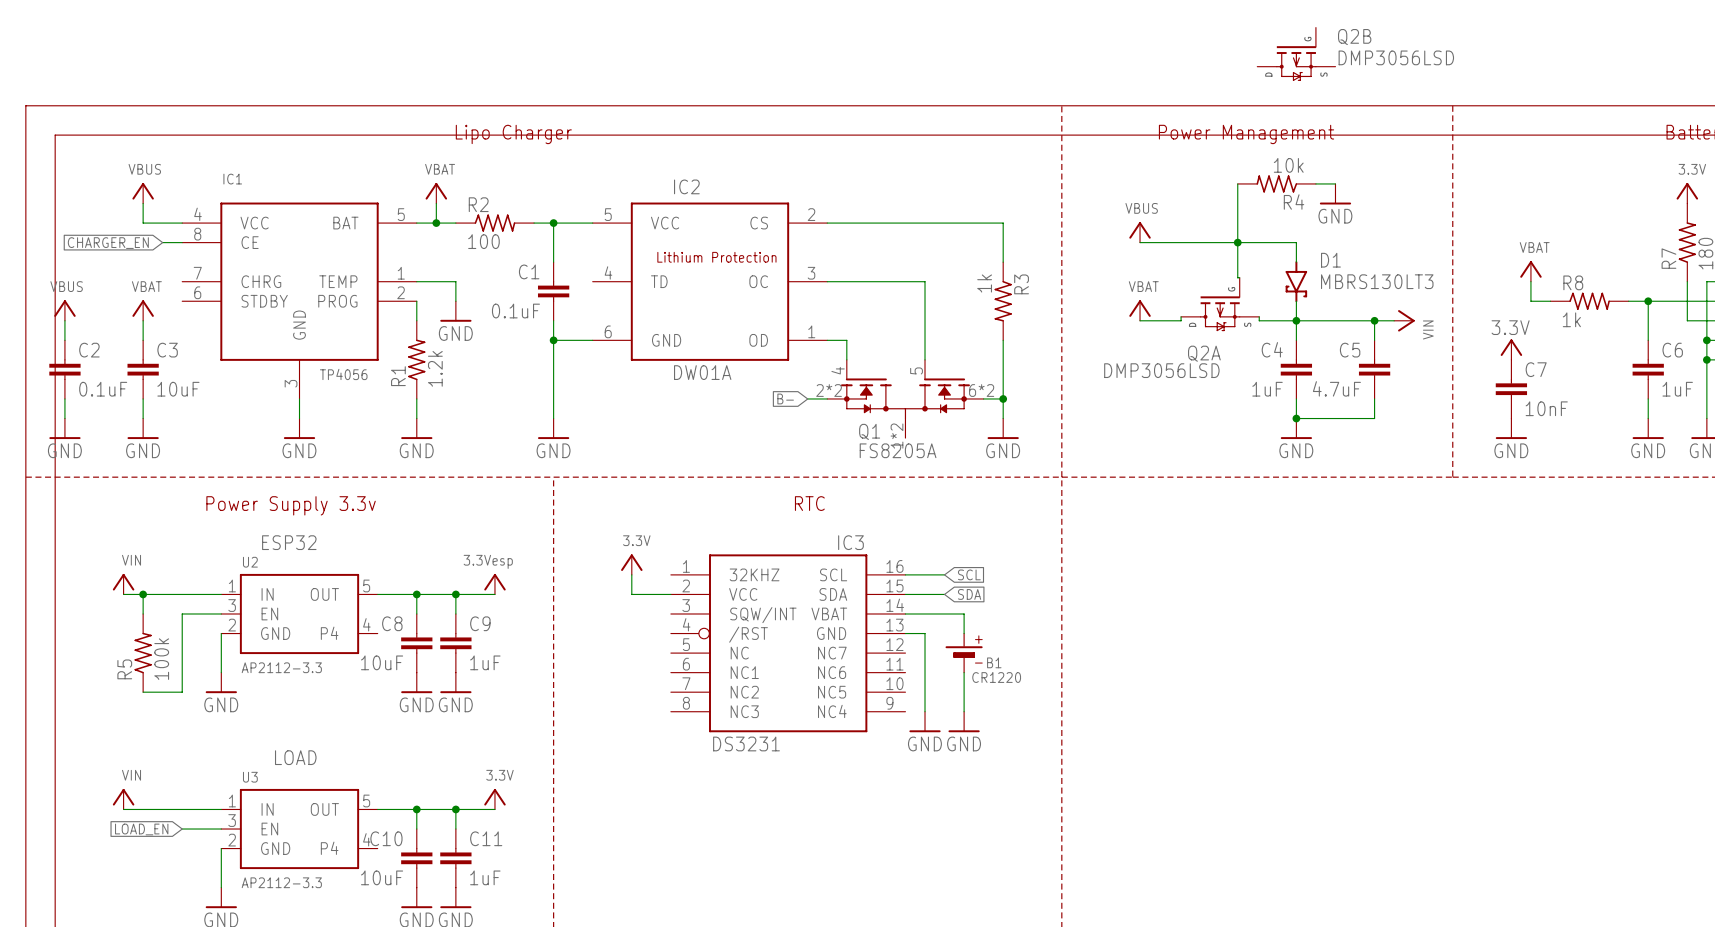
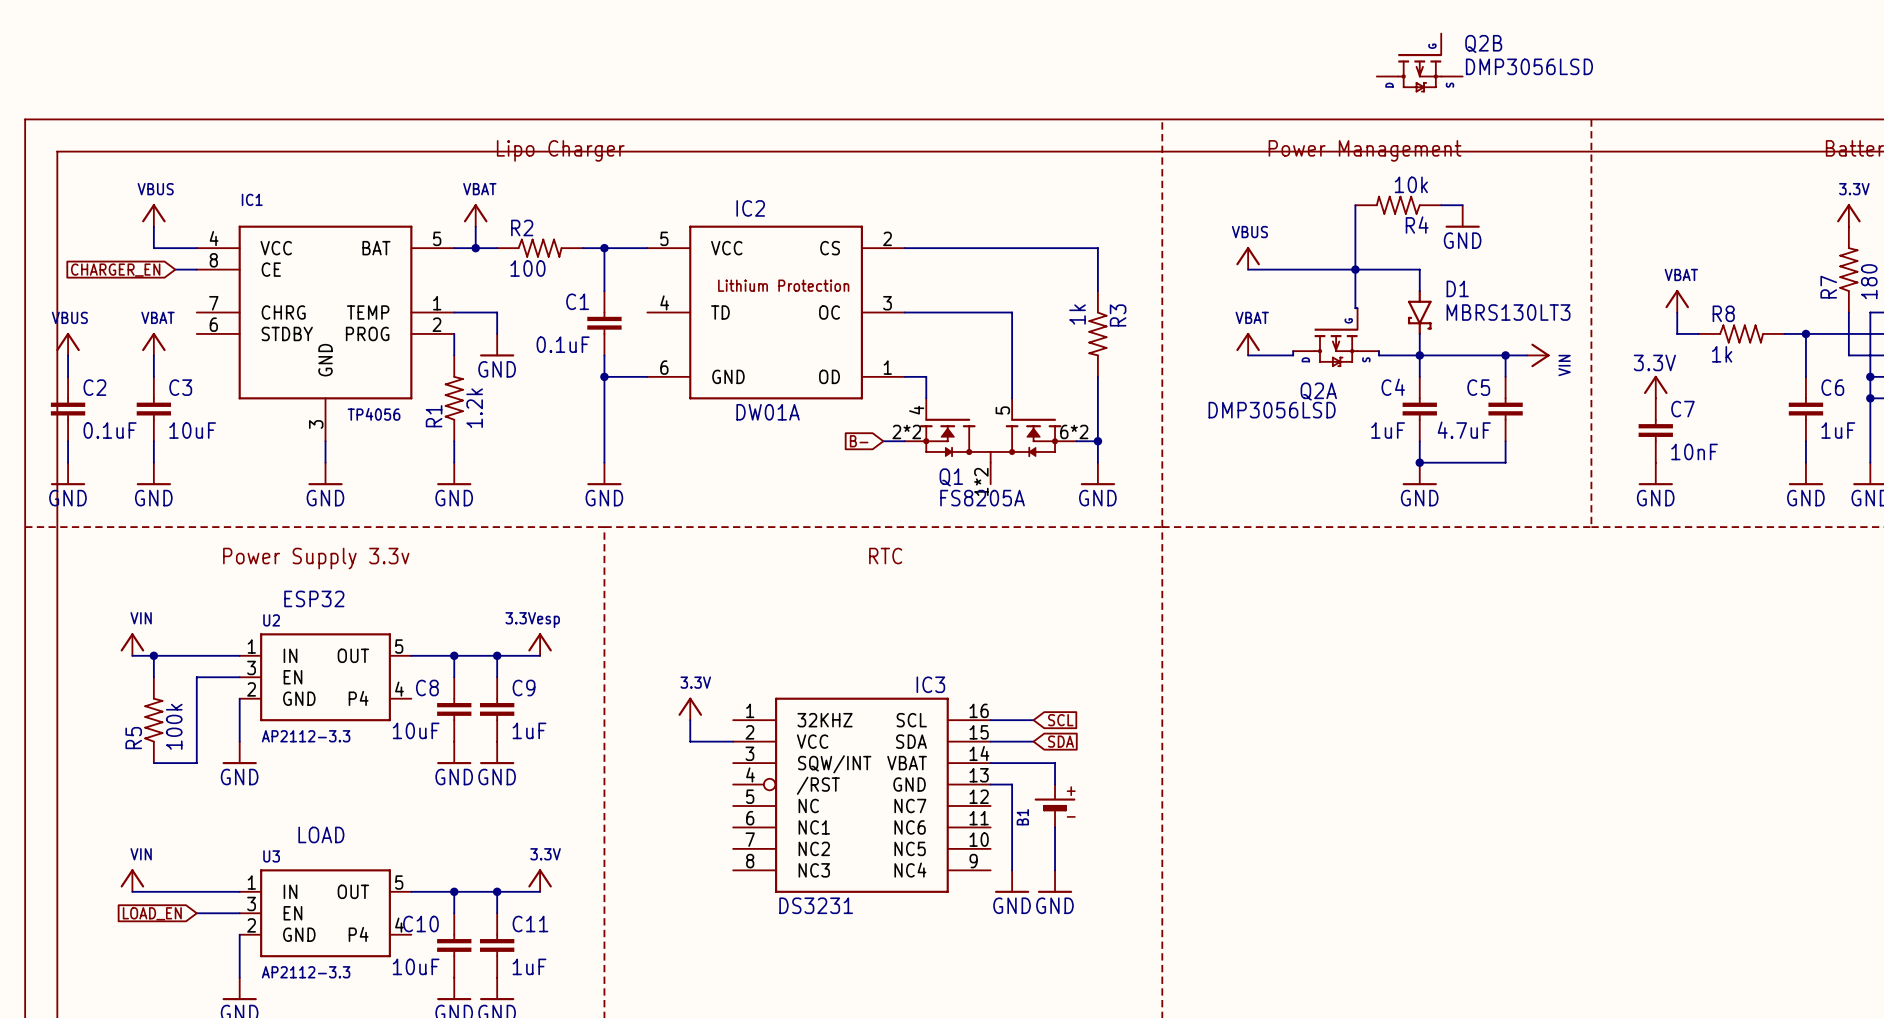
power symbol position: 3.3V (631, 564) -> 3.3V (690, 708)
wire: (631, 574) (631, 594) (670, 594) -> (690, 720) (690, 741) (733, 741)
wire: (905, 574) (944, 574) -> (990, 720) (1033, 720)
global label position: SCL (969, 574) -> SCL (1060, 720)
wire: (905, 594) (944, 594) -> (990, 741) (1033, 741)
global label position: SDA (969, 594) -> SDA (1061, 741)
wire: (905, 613) (964, 613) (964, 633) -> none
wire: (905, 633) (925, 633) (925, 711) -> (990, 784) (1012, 784) (1012, 870)
IC3 position: (788, 643) -> (861, 795)
B1 position: (964, 653) -> (1055, 806)
B1 name rotation: 0° (994, 662) -> 90° counterclockwise (1022, 817)
B1 name position: B1 (994, 662) -> B1 (1022, 817)
wire: (964, 672) (964, 692) -> (990, 763) (1055, 763)
B1 value: CR1220 (996, 677) -> none
power symbol: GND (925, 721) -> none
power symbol: GND (964, 721) -> none
wire: none -> (1055, 827) (1055, 870)
power symbol: none -> GND (1012, 881)
power symbol: none -> GND (1055, 881)

